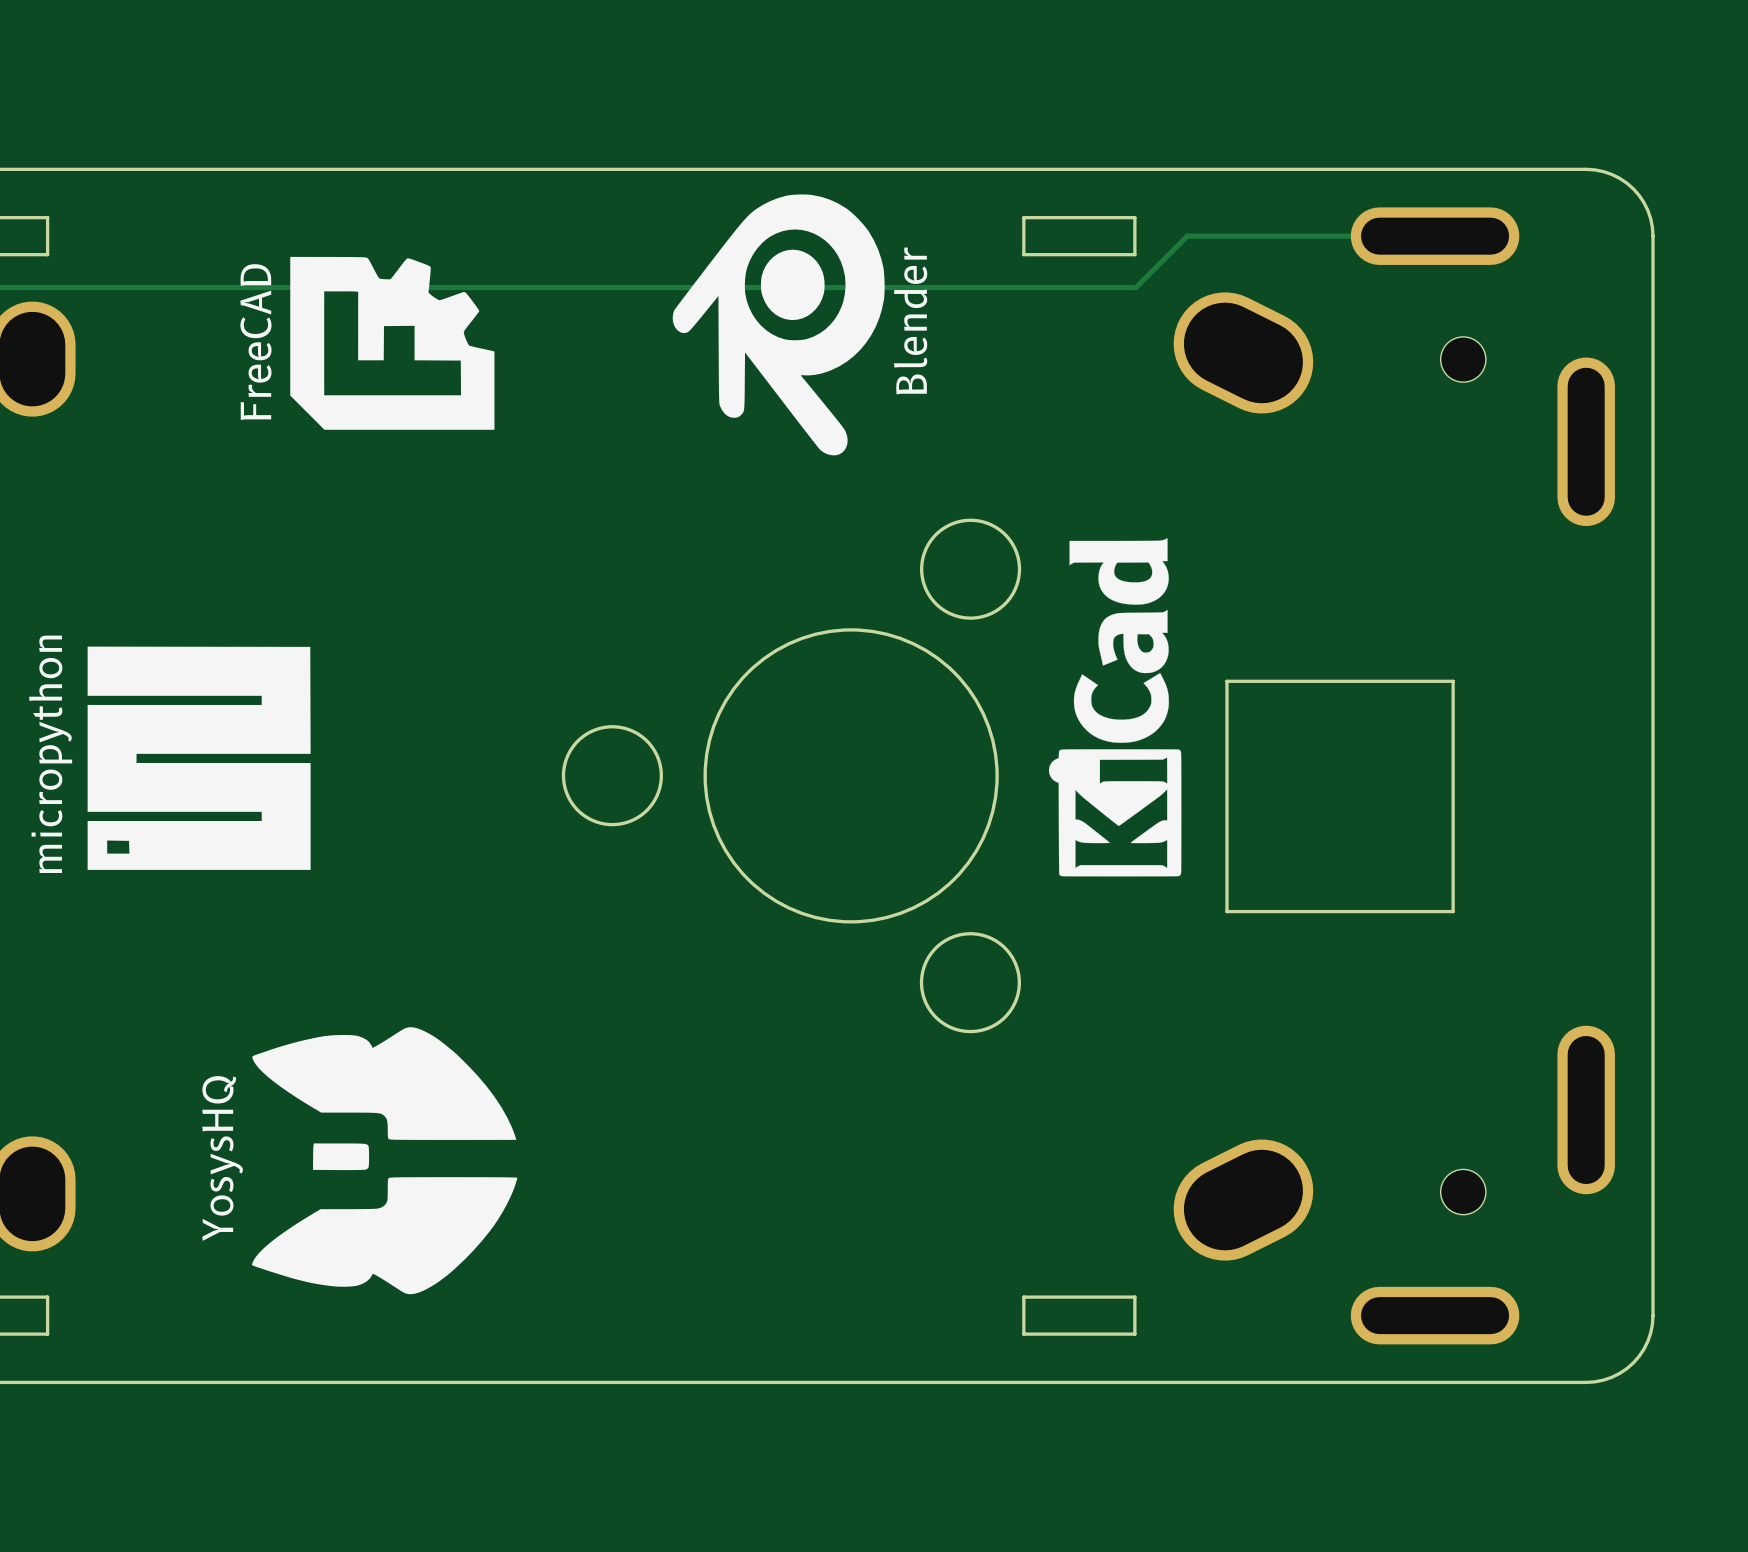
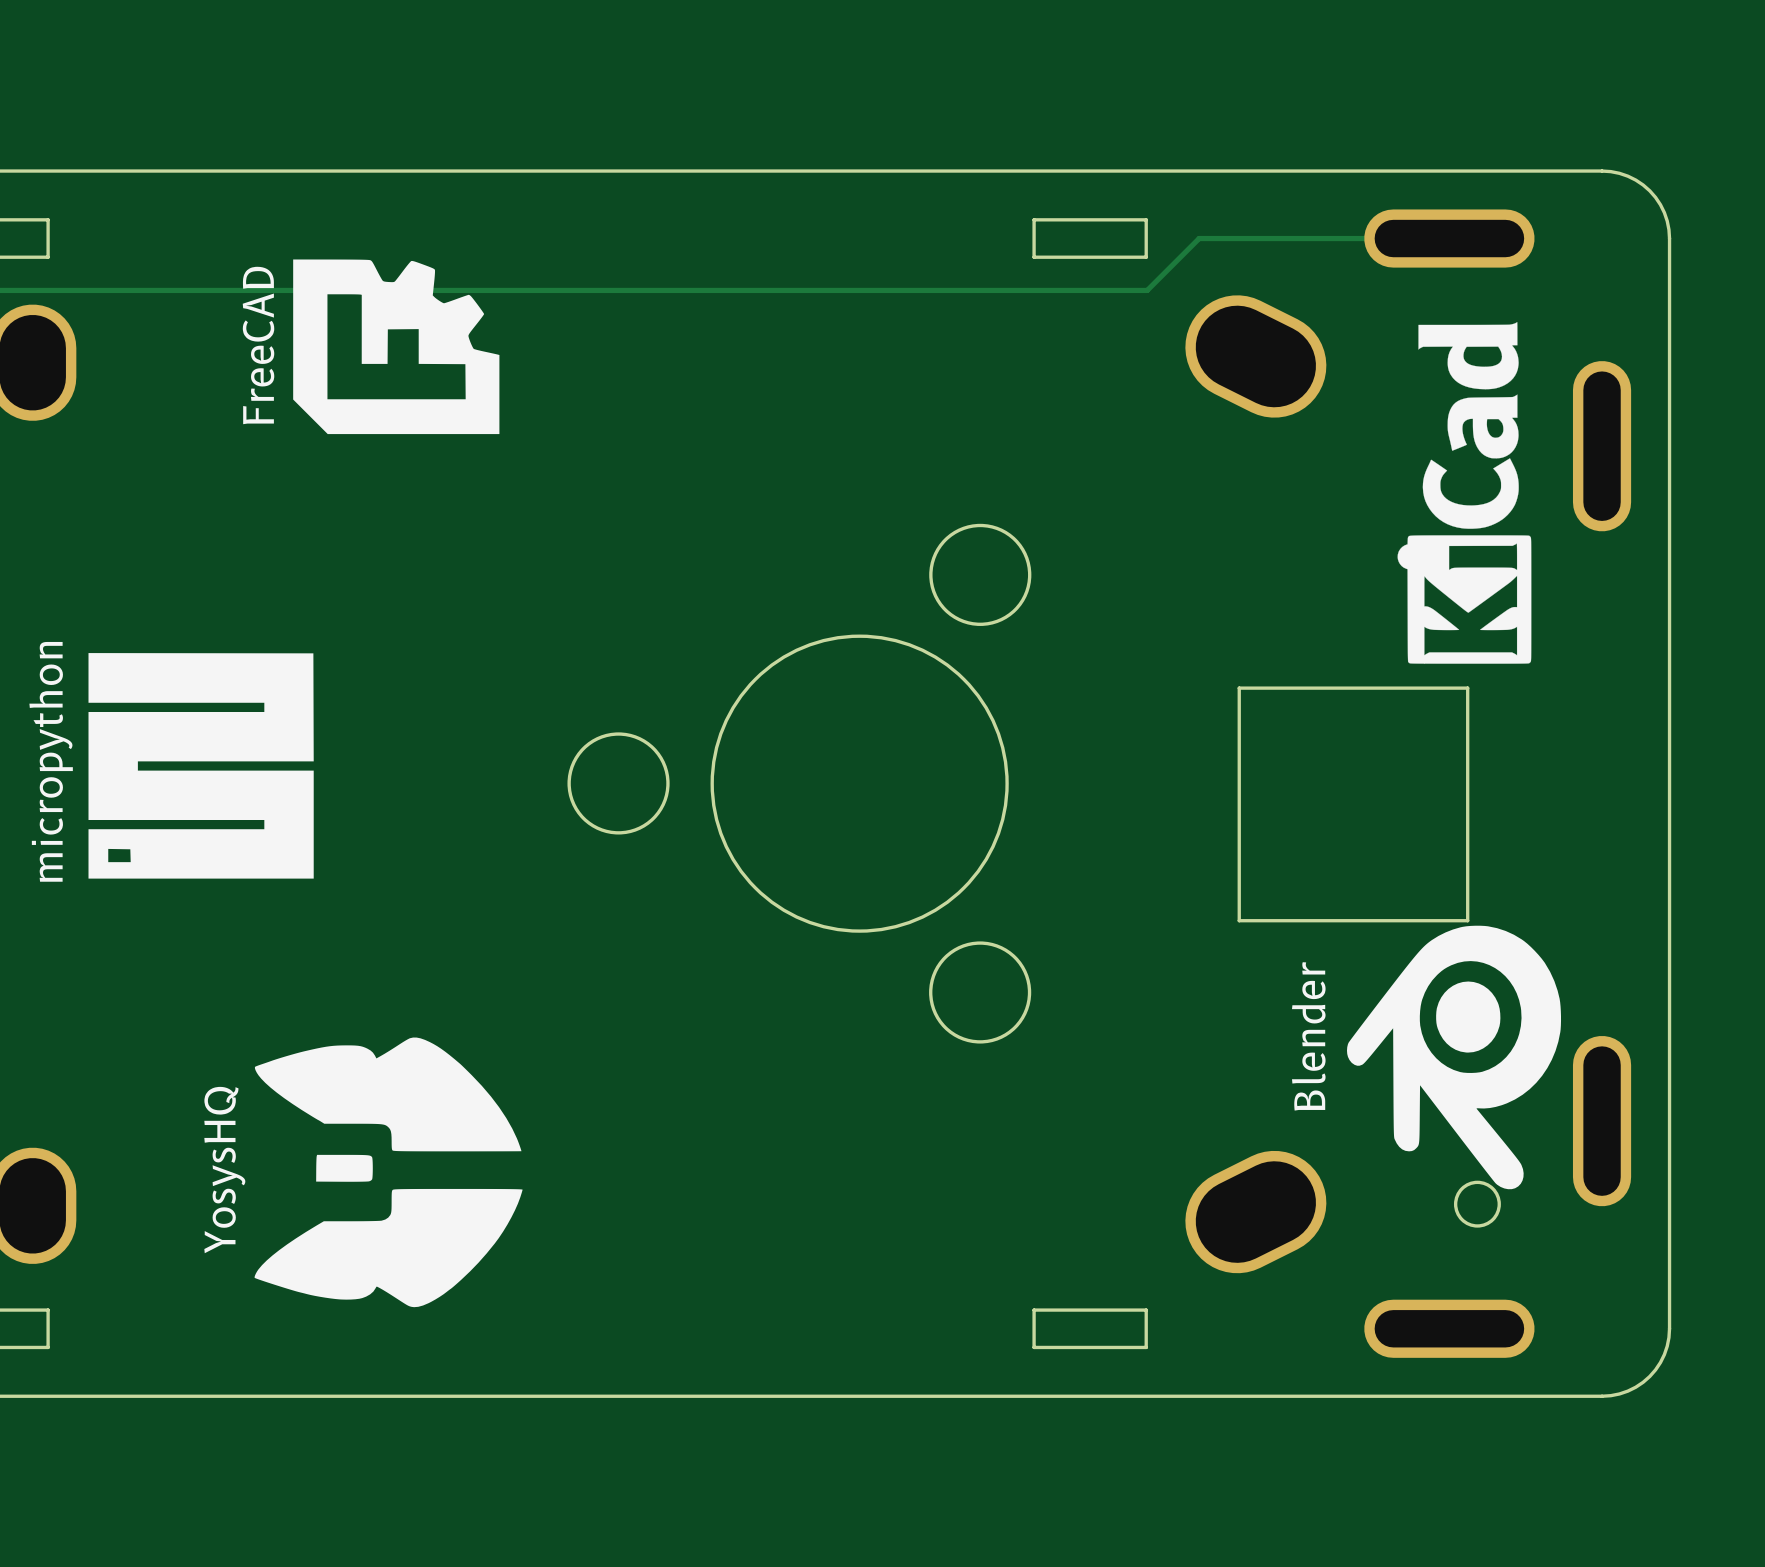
drawing: [672, 194, 885, 456] -> none
text: Blender (910, 320) -> none
part: (1463, 359) -> none
drawing position: (1115, 707) -> (1464, 492)
drawing: none -> [1346, 925, 1562, 1190]
text: none -> Blender (1308, 1036)
round board edge: none -> [1453, 1180, 1501, 1228]
part: (1463, 1192) -> none

